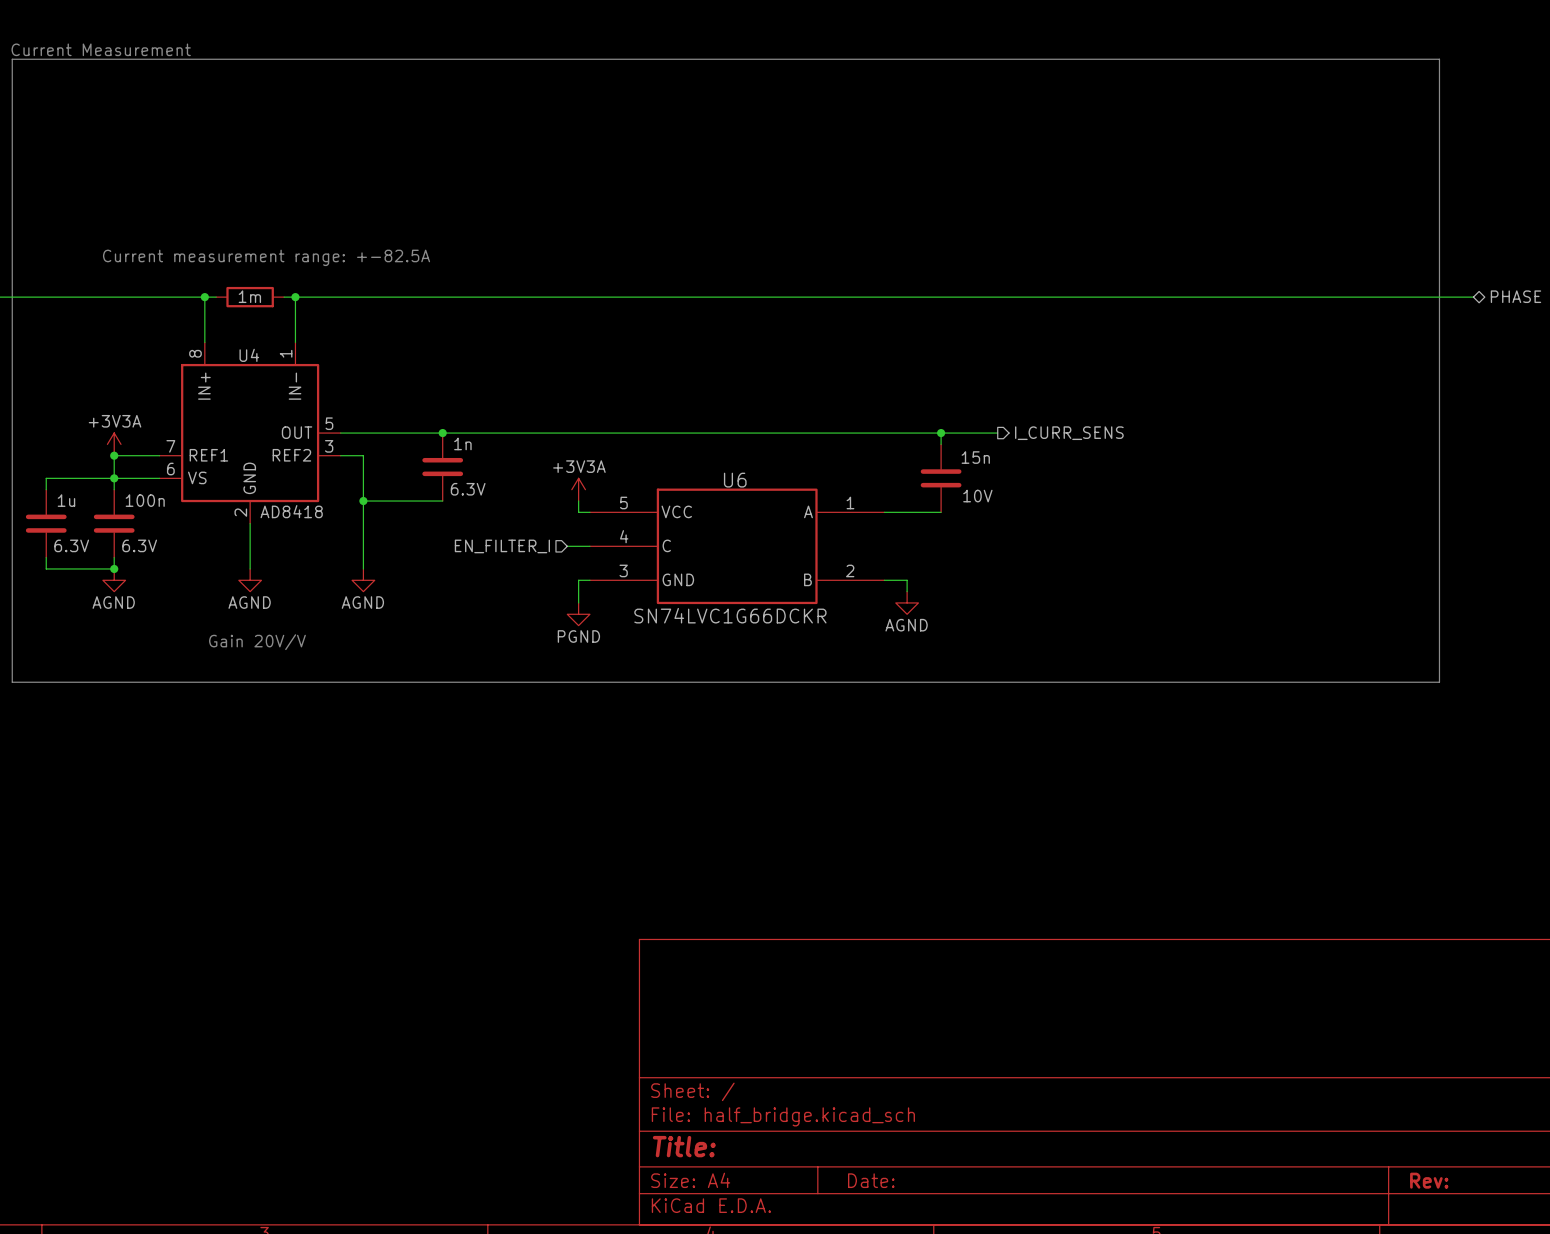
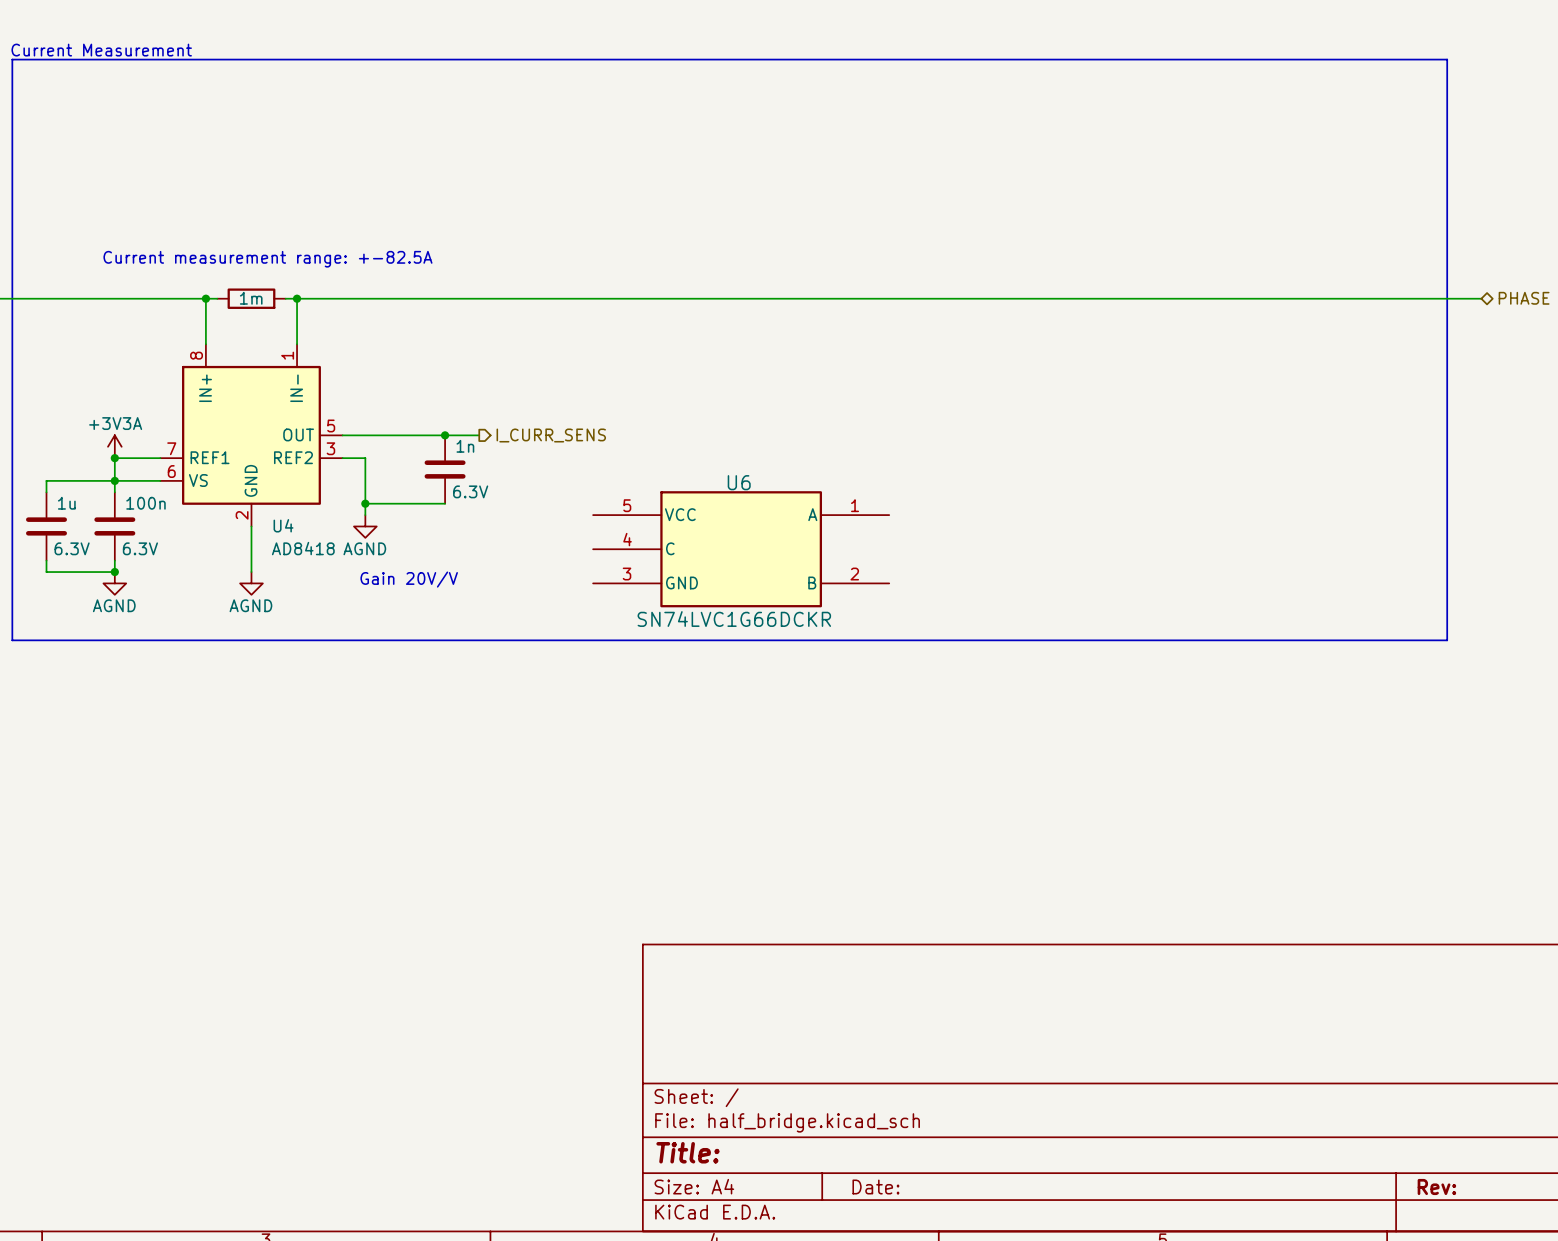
U4 name position: U4 (249, 355) -> U4 (283, 525)
wire: (476, 433) (997, 433) -> none
hierarchical label: none -> I_CURR_SENS (551, 435)
wire: (941, 433) (941, 444) -> none
junction: (941, 433) -> none
hierarchical label: I_CURR_SENS (1069, 433) -> none
part: 15n (941, 478) -> none
power symbol: +3V3A (578, 489) -> none
wire: (578, 501) (578, 512) (589, 512) -> none
U4 value position: AD8418 (291, 511) -> AD8418 (303, 548)
wire: (363, 512) (363, 568) -> none
wire: (884, 512) (941, 512) -> none
hierarchical label: EN_FILTER_I (502, 546) -> none
wire: (567, 546) (589, 546) -> none
power symbol position: AGND (363, 580) -> AGND (365, 526)
wire: (589, 580) (578, 580) (578, 602) -> none
wire: (884, 580) (907, 580) (907, 591) -> none
power symbol: AGND (907, 602) -> none
power symbol: PGND (578, 614) -> none
line: (12, 636) (12, 682) (1439, 682) (1439, 636) -> (12, 640) (1447, 640)
text position: Gain 20V/V (257, 642) -> Gain 20V/V (409, 579)

